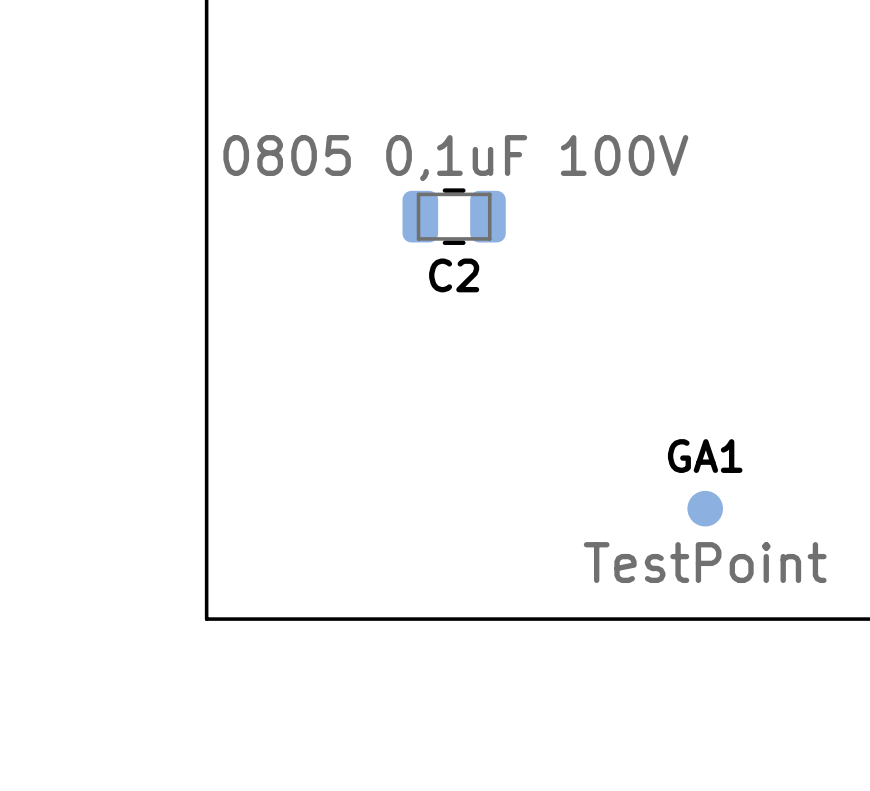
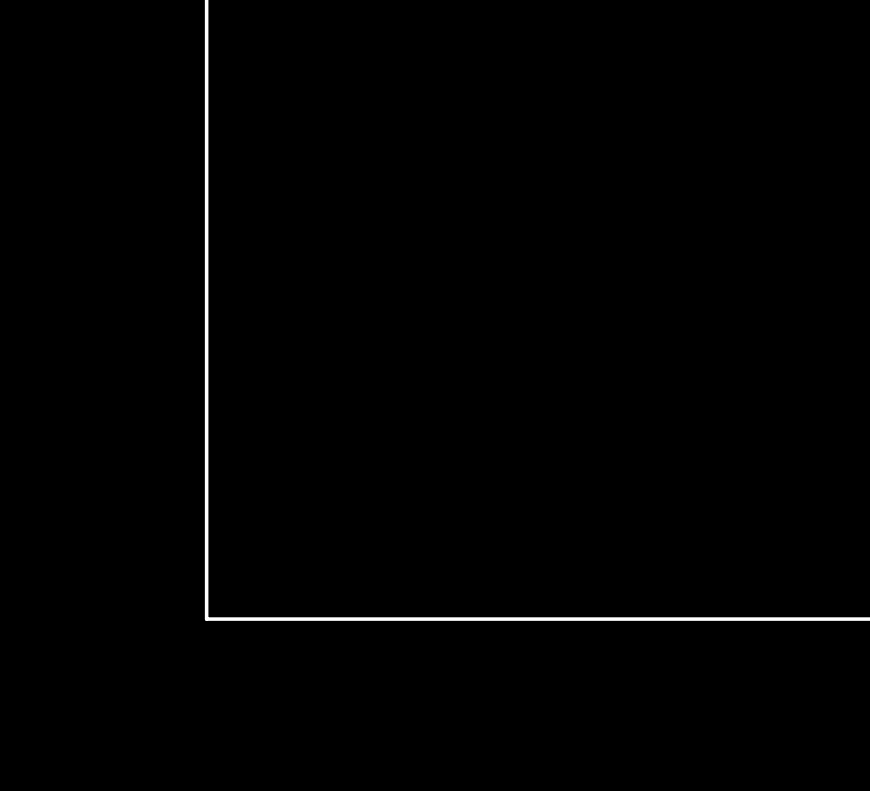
C2: 0805 0,1uF 100V (454, 216) -> none
GA1: TestPoint (705, 508) -> none

